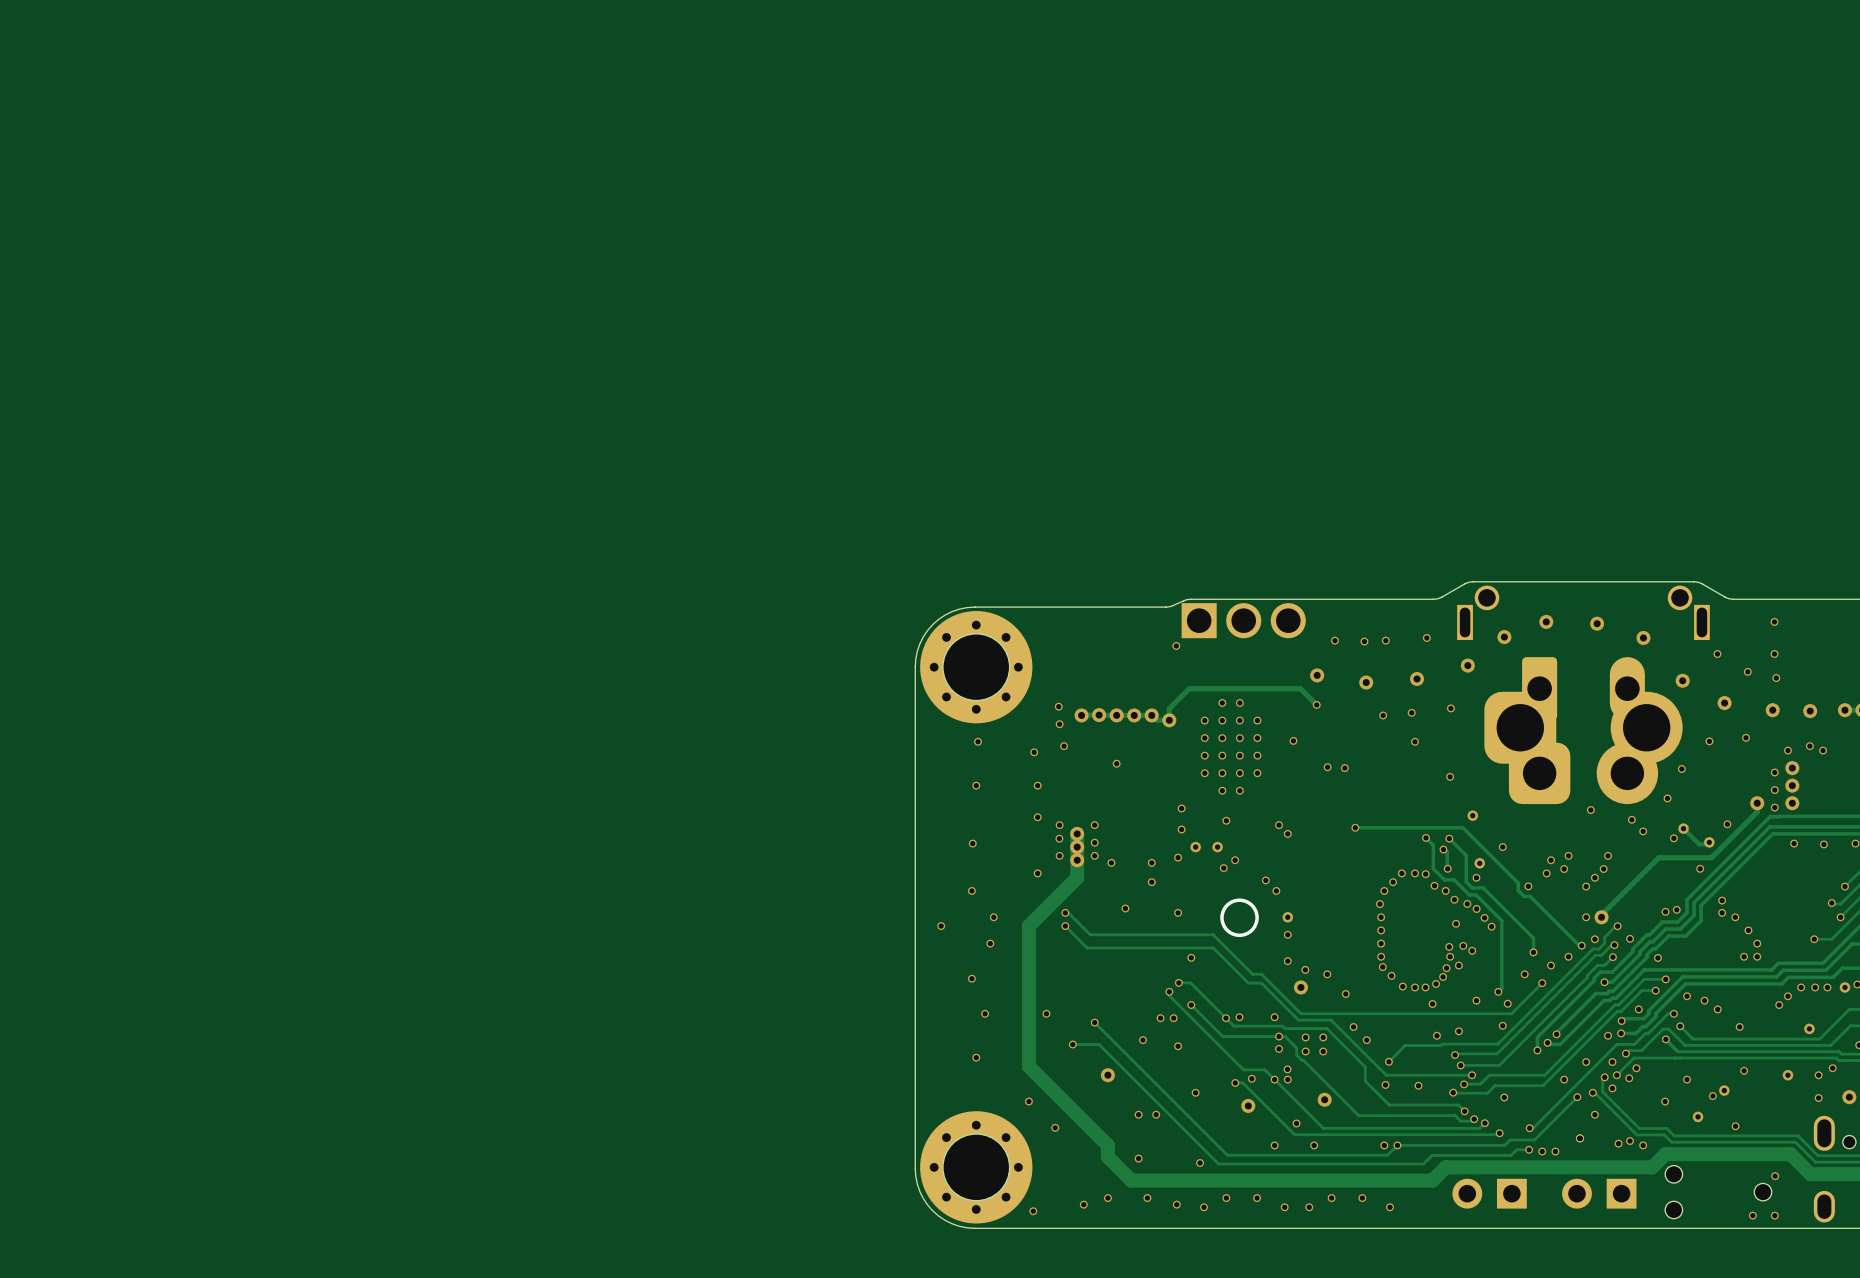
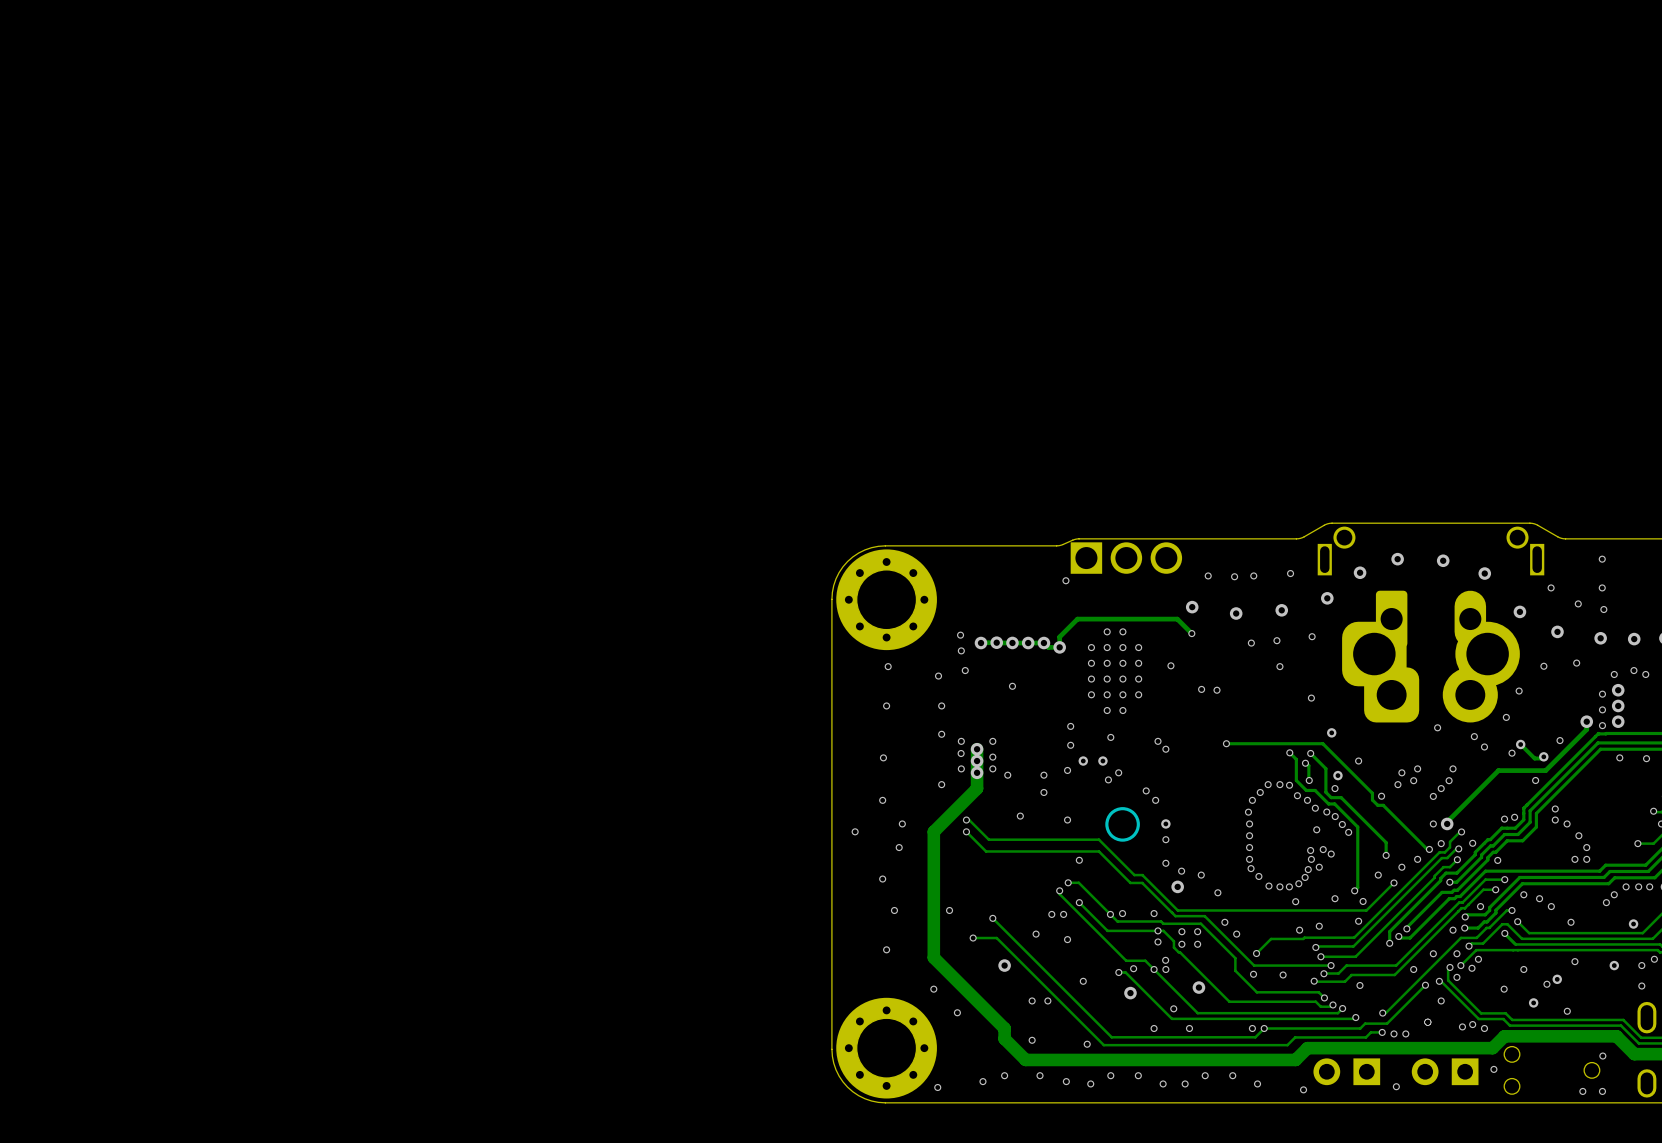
via: none -> (1493, 1069)
via: none -> (1396, 1086)
via: none -> (1303, 1089)

